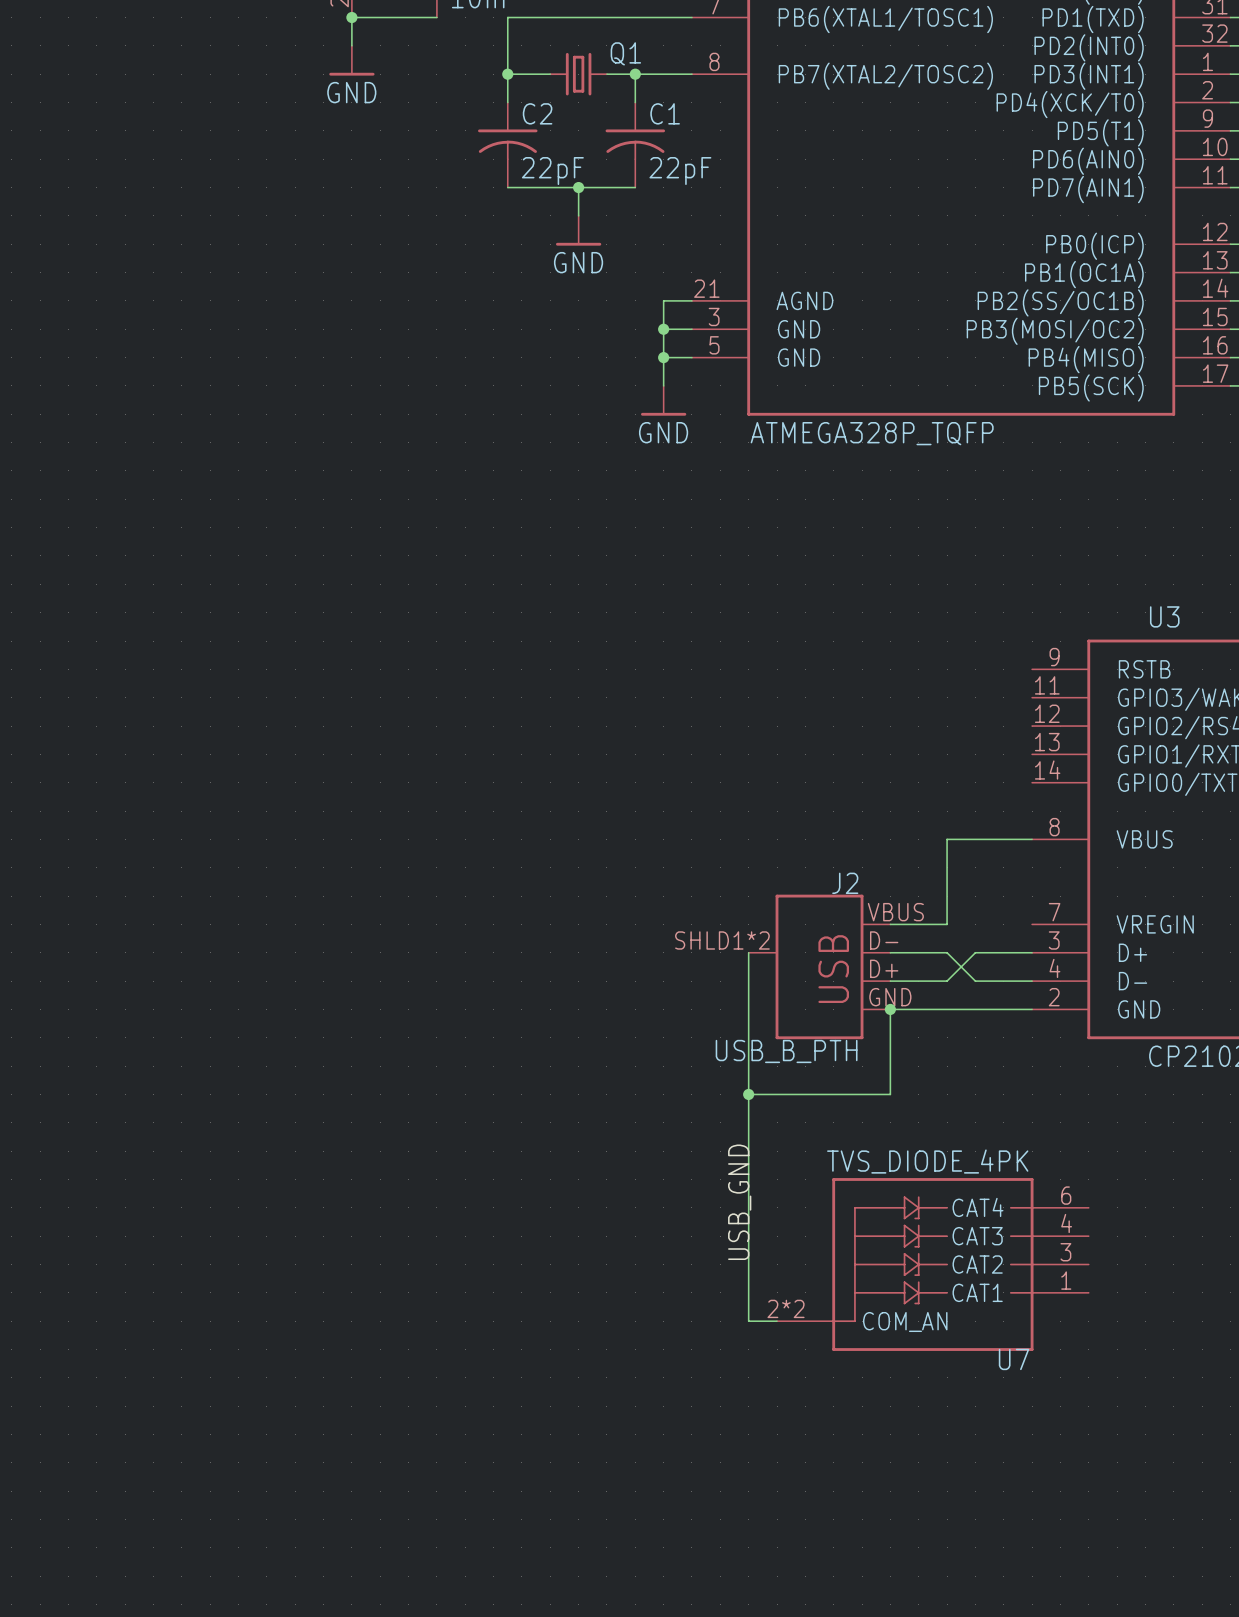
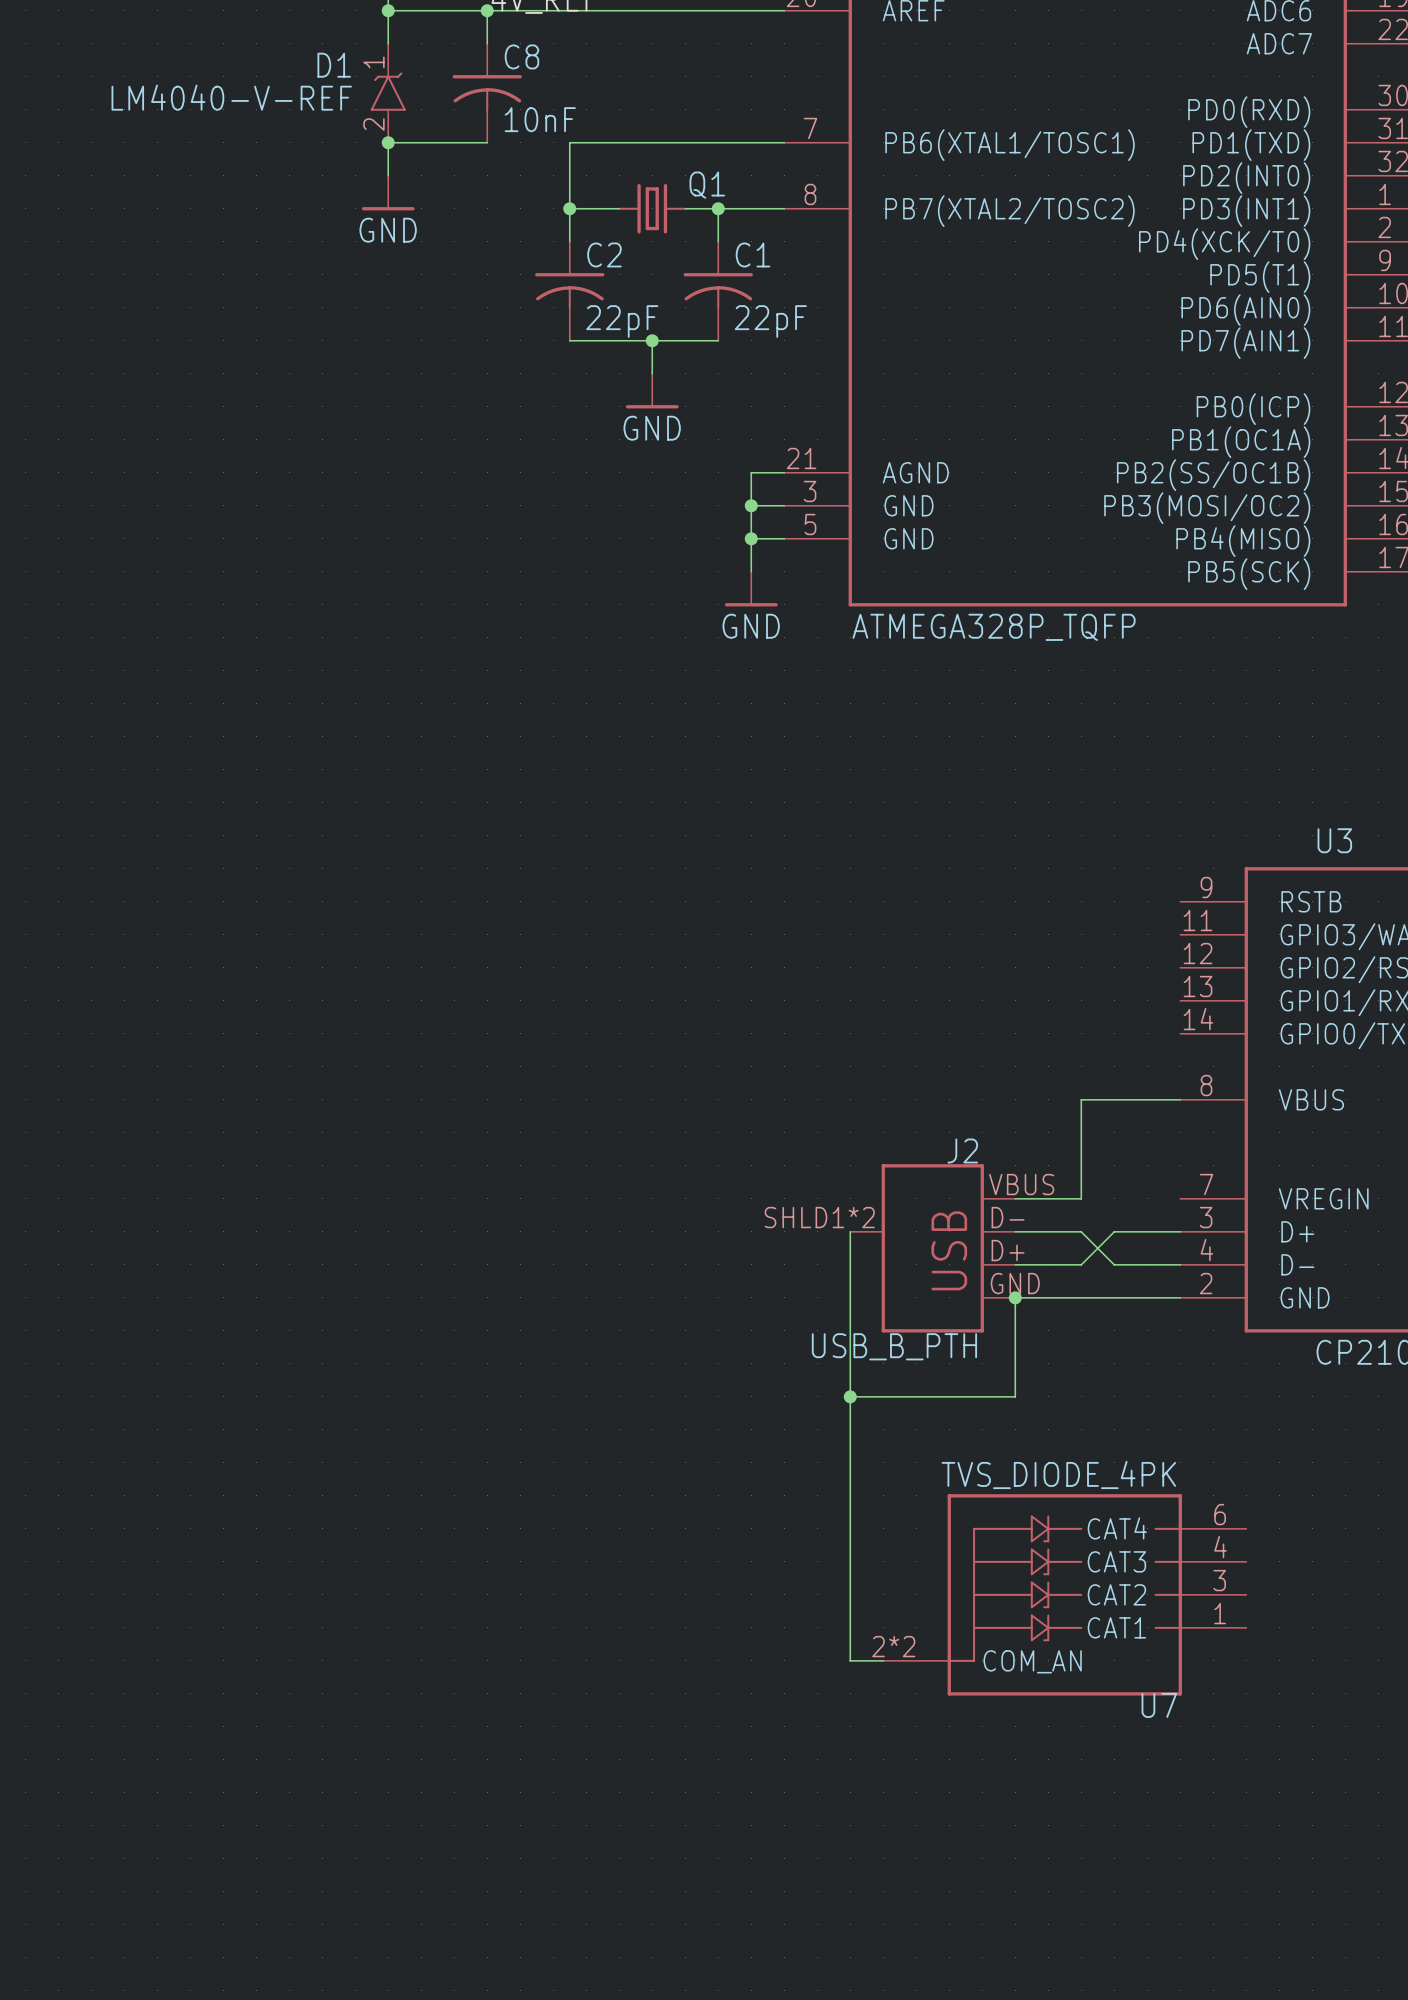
label: USB_GND (739, 1202) -> none

